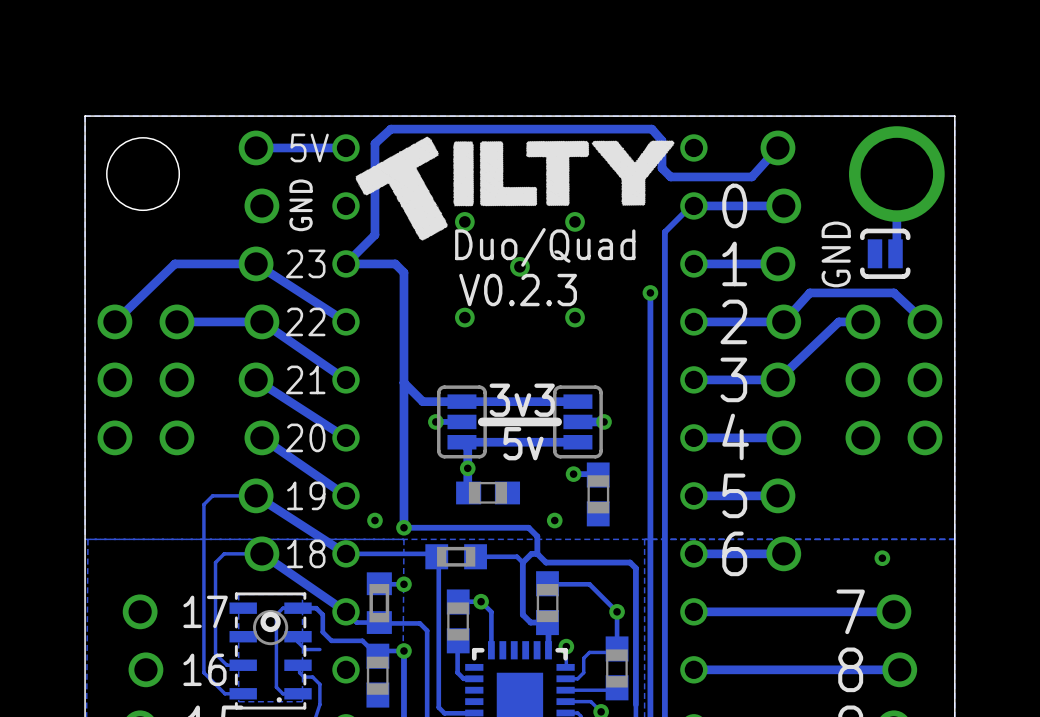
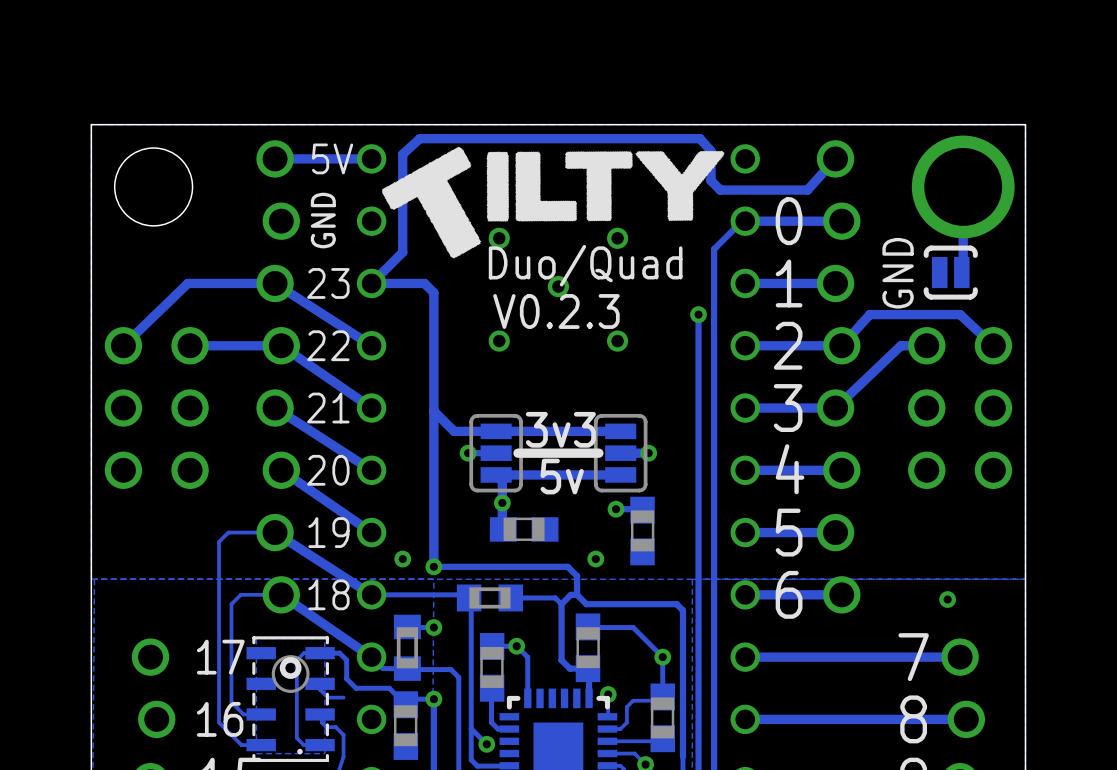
track: none -> (471, 728) (486, 744)
via: none -> (486, 744)

